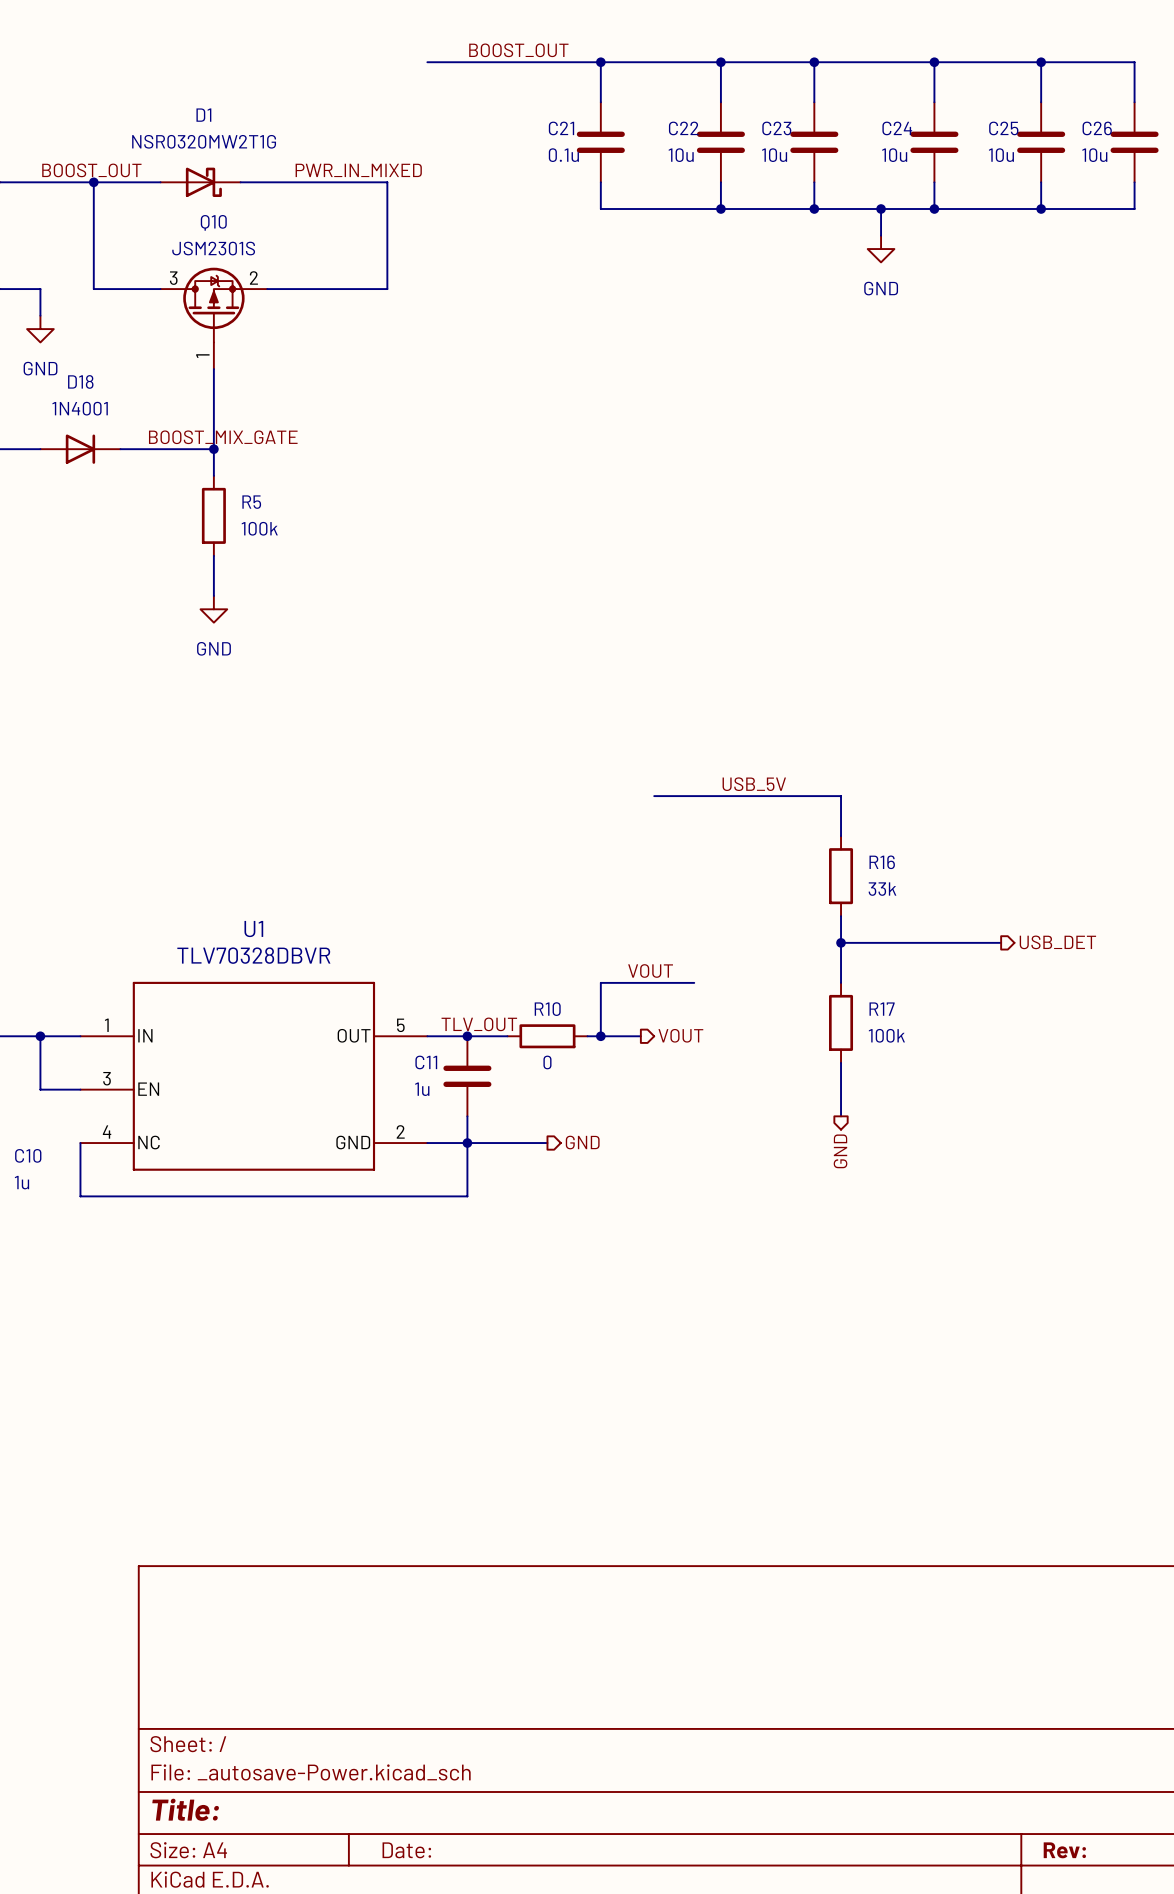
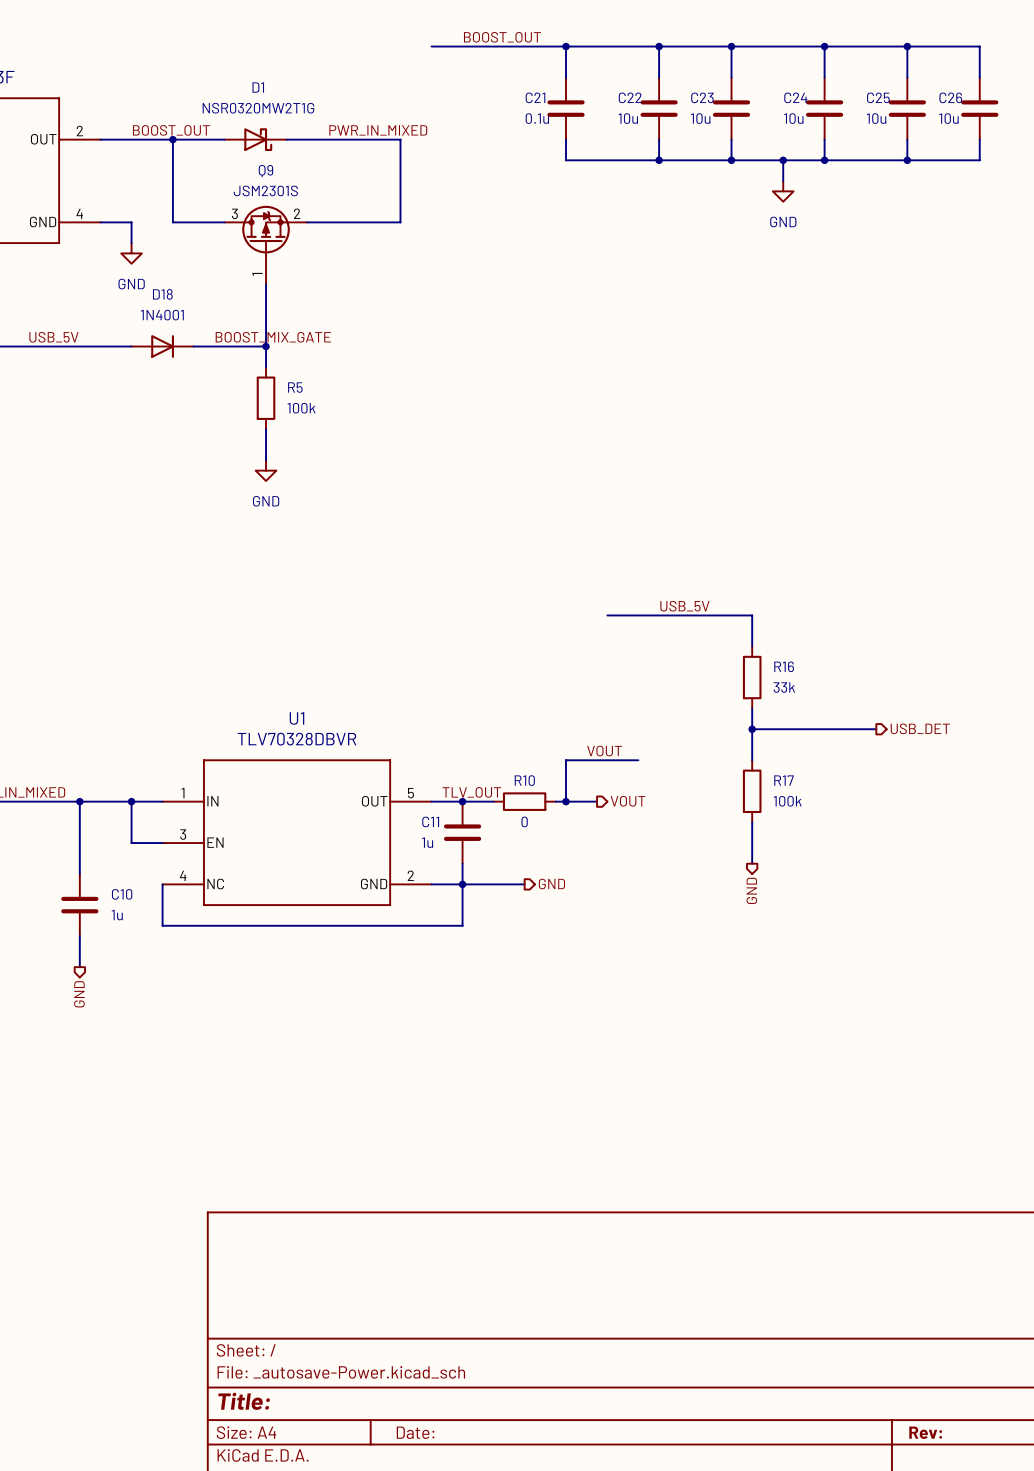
Q10 name: Q10 (213, 222) -> Q9 (265, 171)

